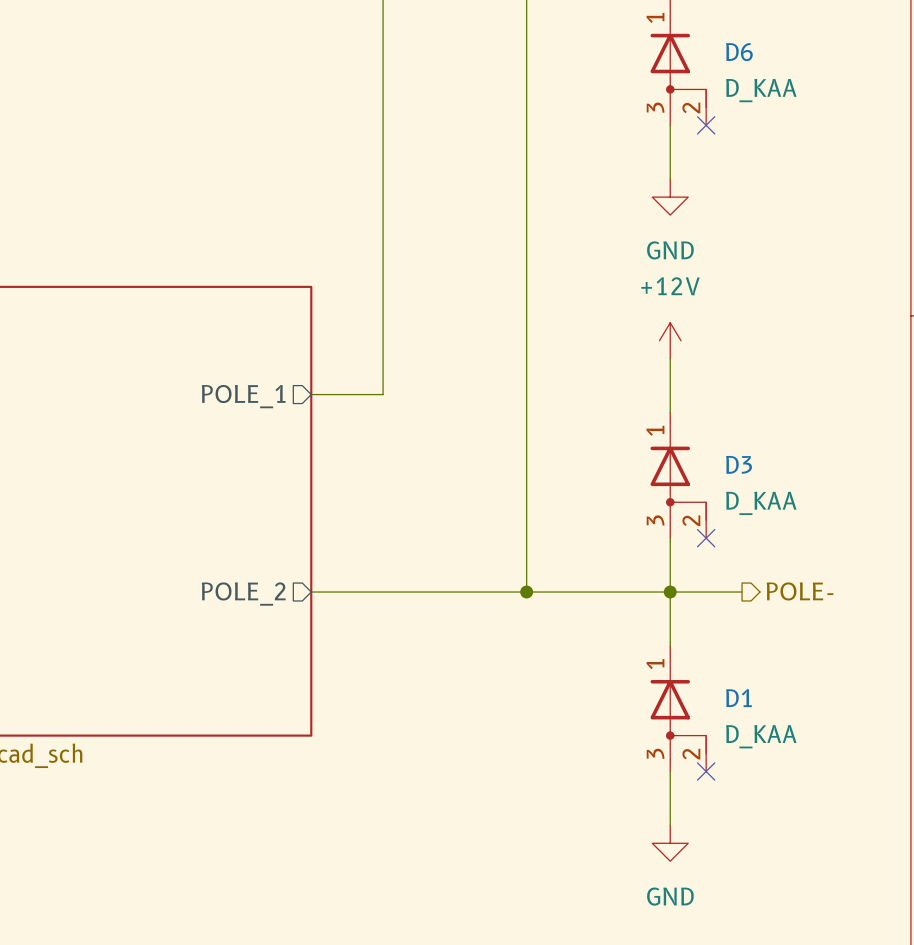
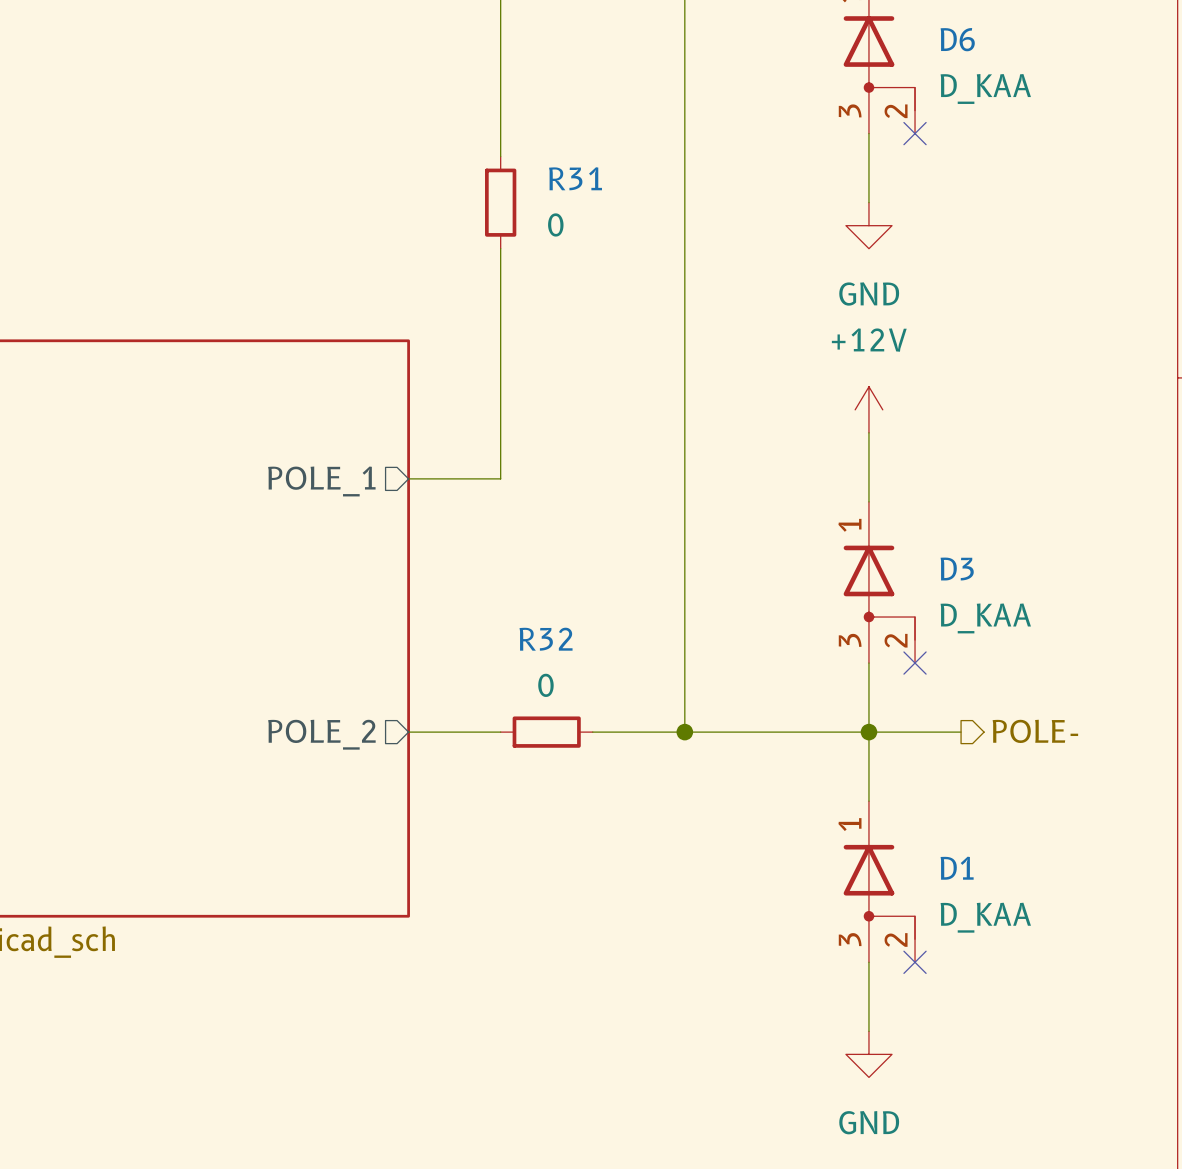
wire: (383, 143) (383, 215) -> none
R31: none -> 0 (500, 202)
wire: (383, 592) (454, 592) -> none
R32: none -> 0 (546, 732)

